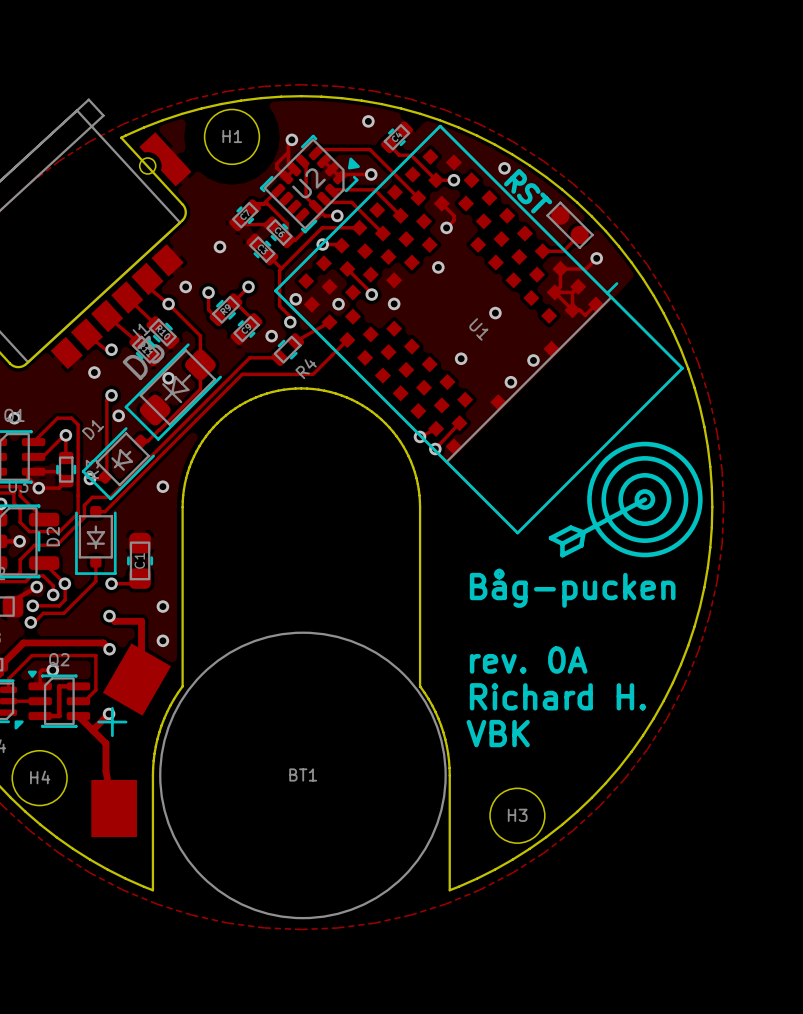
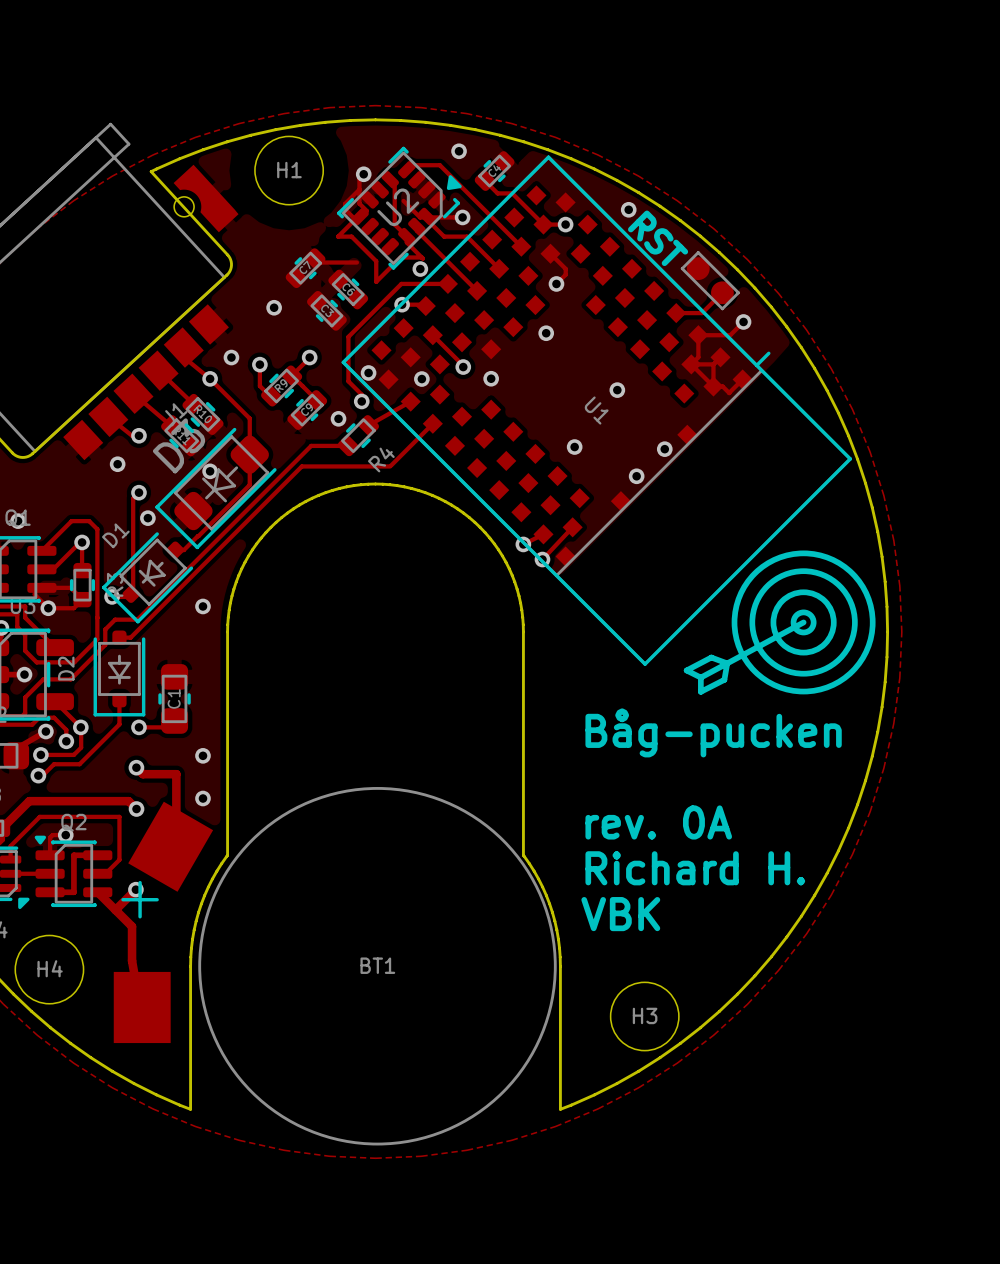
track: none -> (385, 175) (394, 184) (394, 224) (406, 236) (406, 242) (422, 258)
track: (369, 149) (319, 149) (315, 153) -> (461, 186) (439, 165) (411, 165) (406, 169)
track: (306, 164) (306, 197) (324, 215) (337, 215) -> none
track: none -> (360, 216) (338, 236) (351, 236) (376, 261) (376, 281) (400, 257) (421, 257)
U2 position: (309, 184) -> (399, 208)
track: (356, 189) (331, 190) -> (444, 236) (426, 219) (426, 216)
track: (276, 190) (263, 203) -> none
track: (323, 198) (327, 202) (351, 202) -> (416, 226) (416, 230) (438, 252)
track: (252, 207) (256, 203) (267, 203) (287, 223) (287, 240) (295, 240) (322, 213) -> none
track: (239, 224) (271, 224) -> (316, 262) (356, 262)
track: (270, 257) (281, 268) -> none

